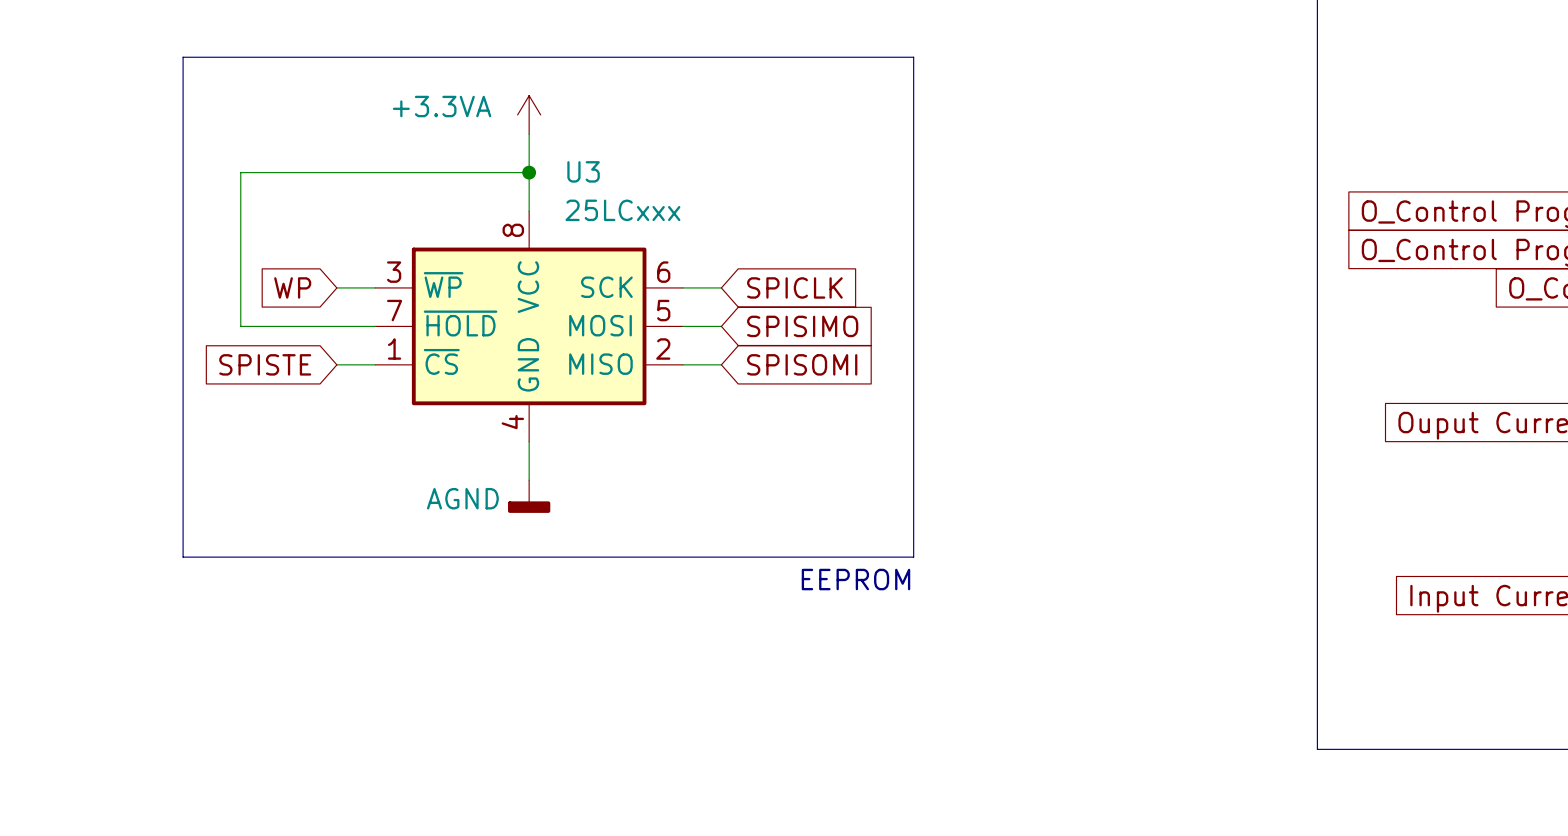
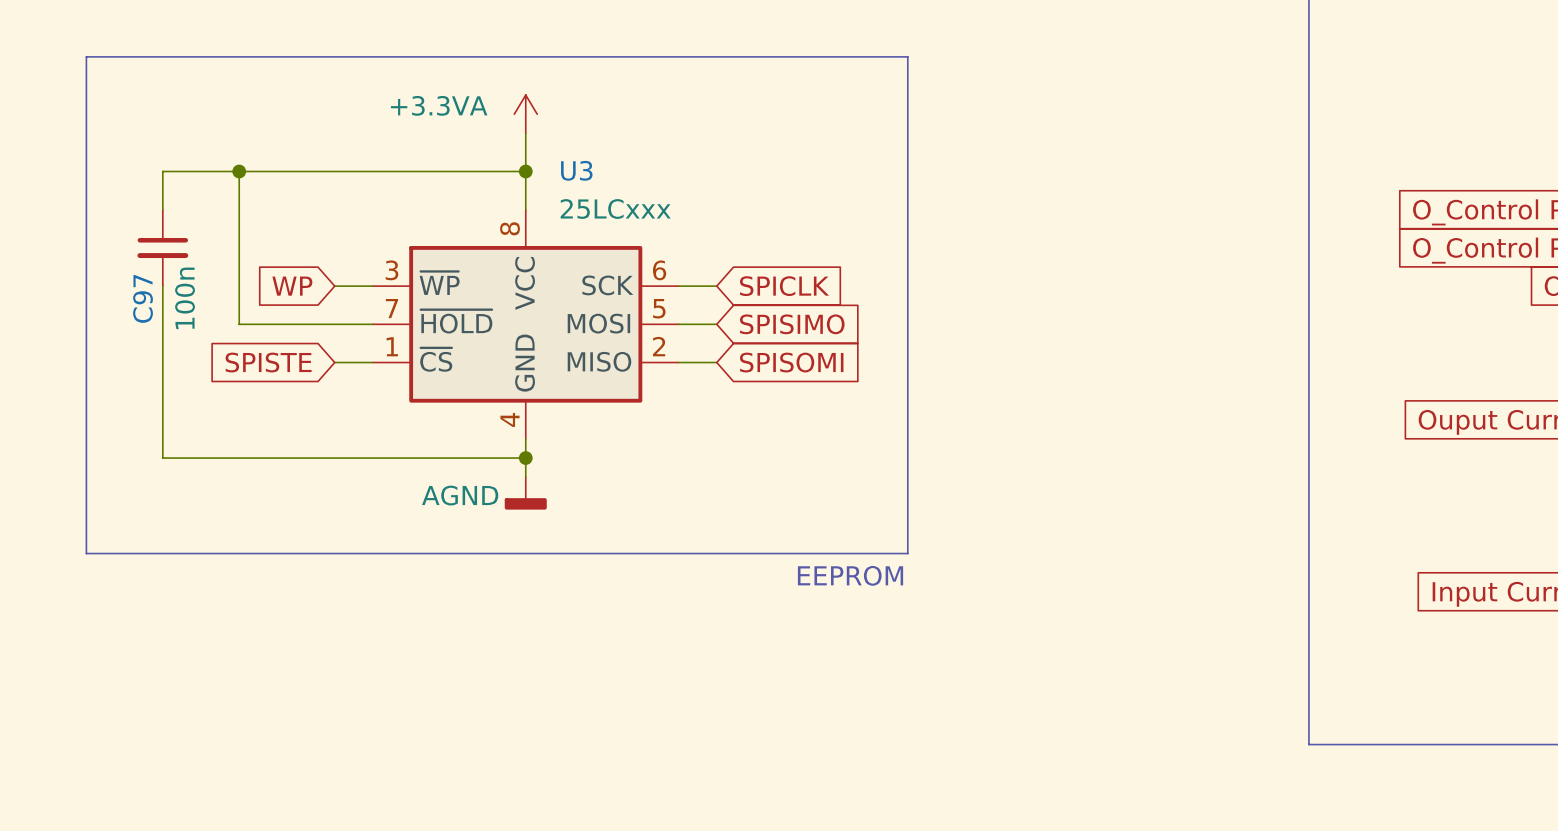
line: (183, 57) (183, 557) -> (181, 56) (86, 56) (86, 553) (181, 553)
wire: none -> (239, 171) (162, 171) (162, 209)
junction: none -> (239, 171)
C97: none -> 100n (162, 247)
wire: none -> (162, 286) (162, 458) (525, 458)
junction: none -> (525, 458)

